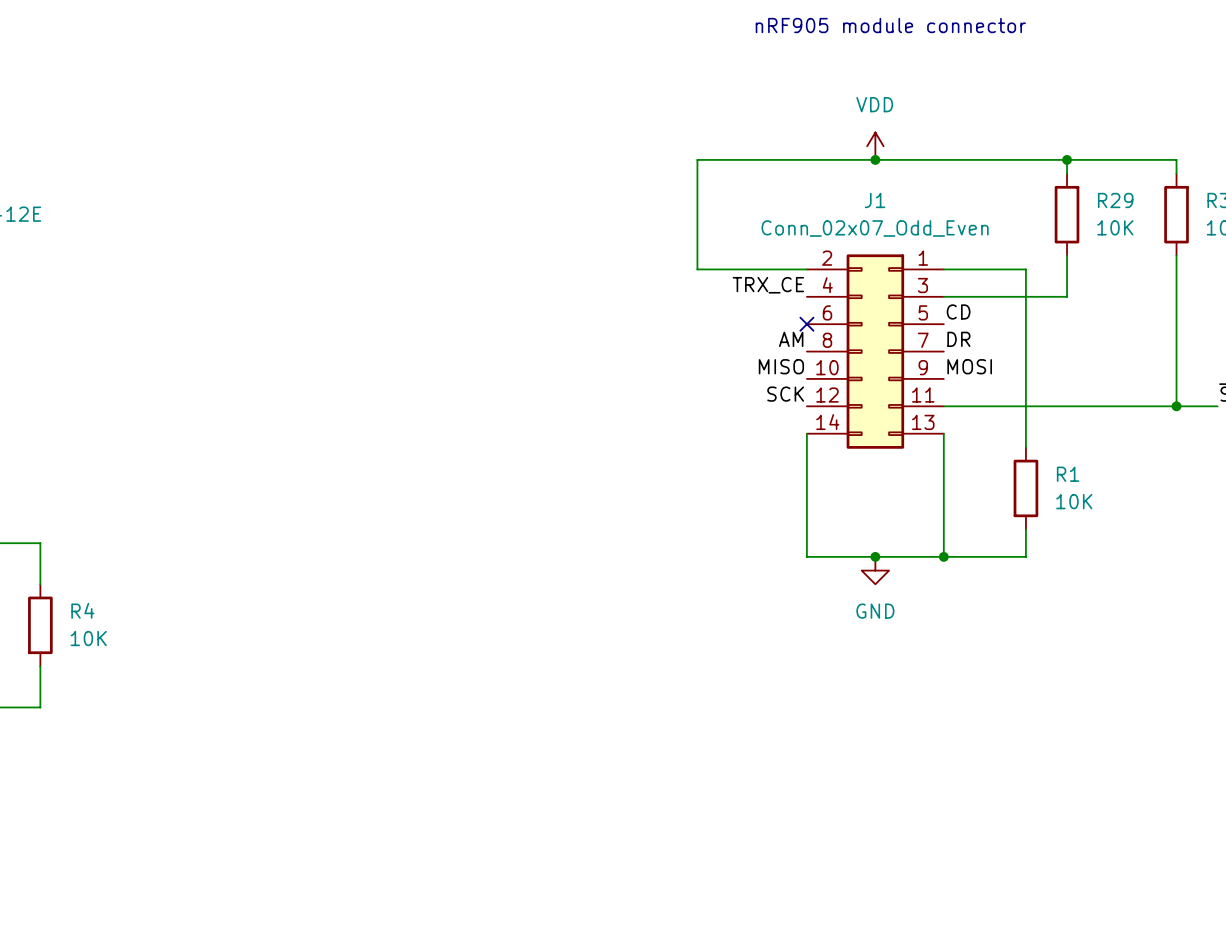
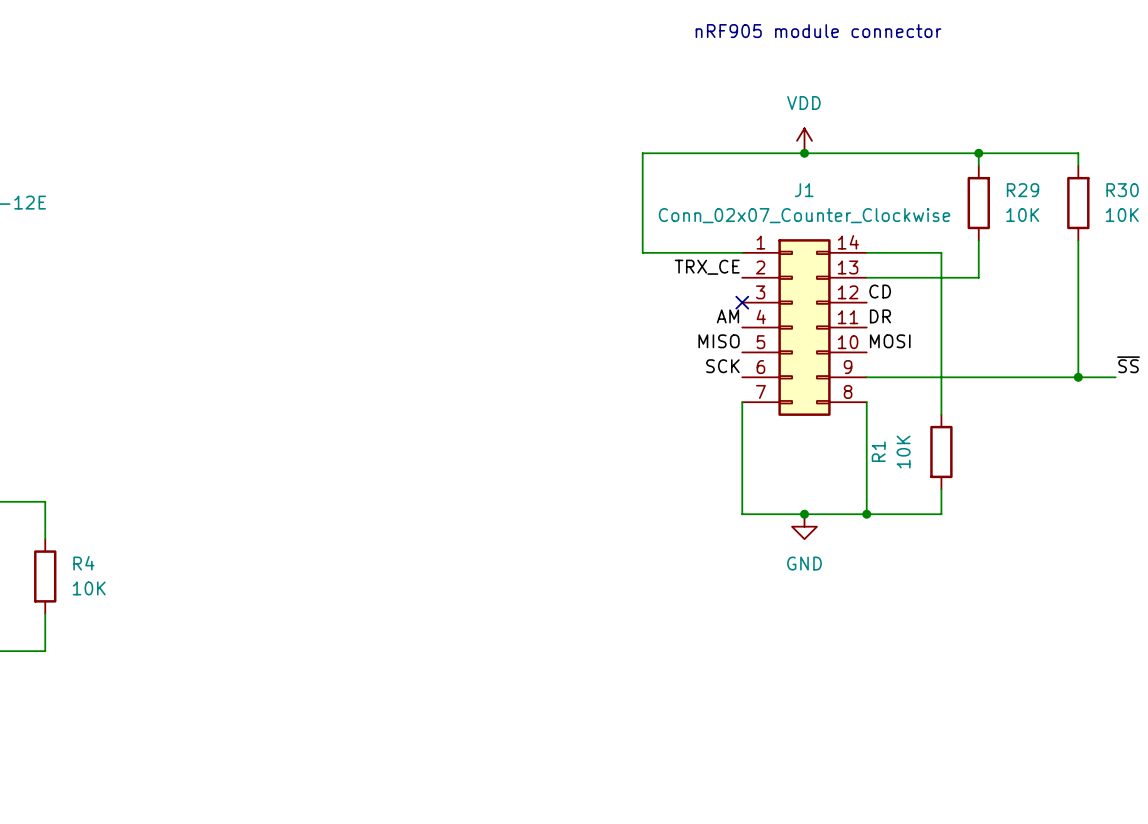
J1 value: Conn_02x07_Odd_Even (875, 228) -> Conn_02x07_Counter_Clockwise (804, 215)
J1 symbol: [806, 254, 944, 449] -> [742, 239, 867, 416]
R1 name rotation: 0° (1068, 474) -> 90° counterclockwise (878, 451)
R1 name position: R1 (1068, 474) -> R1 (878, 451)
R1 value rotation: 0° (1074, 501) -> 90° counterclockwise (903, 452)
R1 value position: 10K (1074, 501) -> 10K (903, 452)

